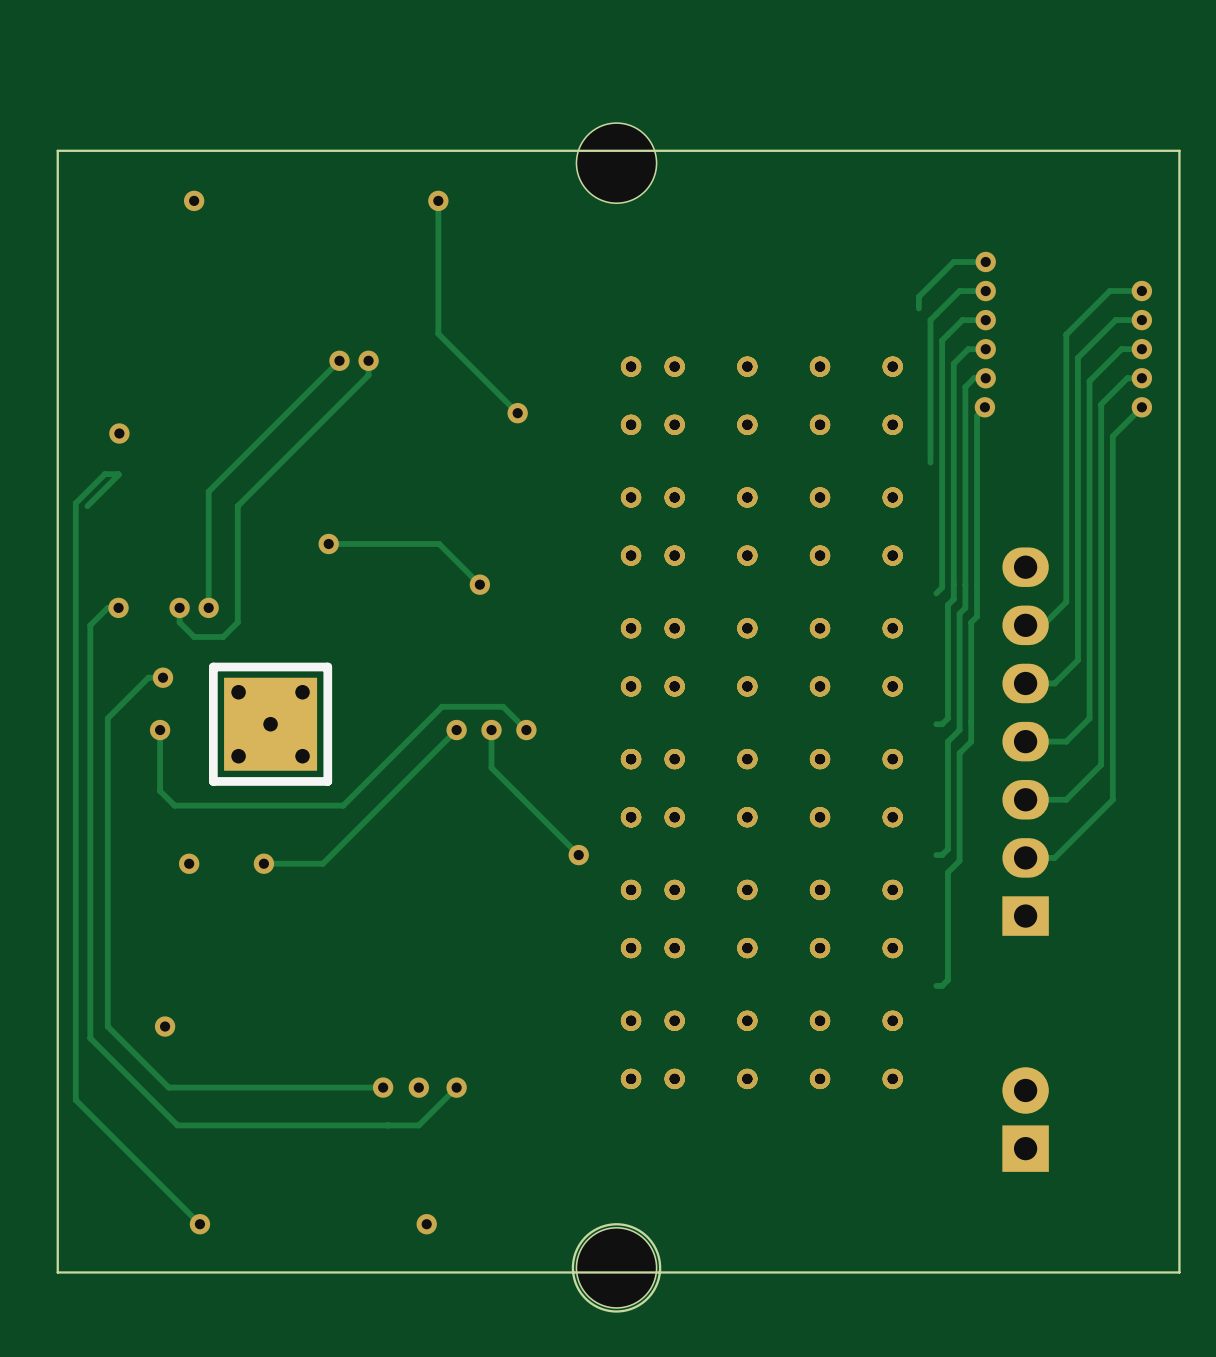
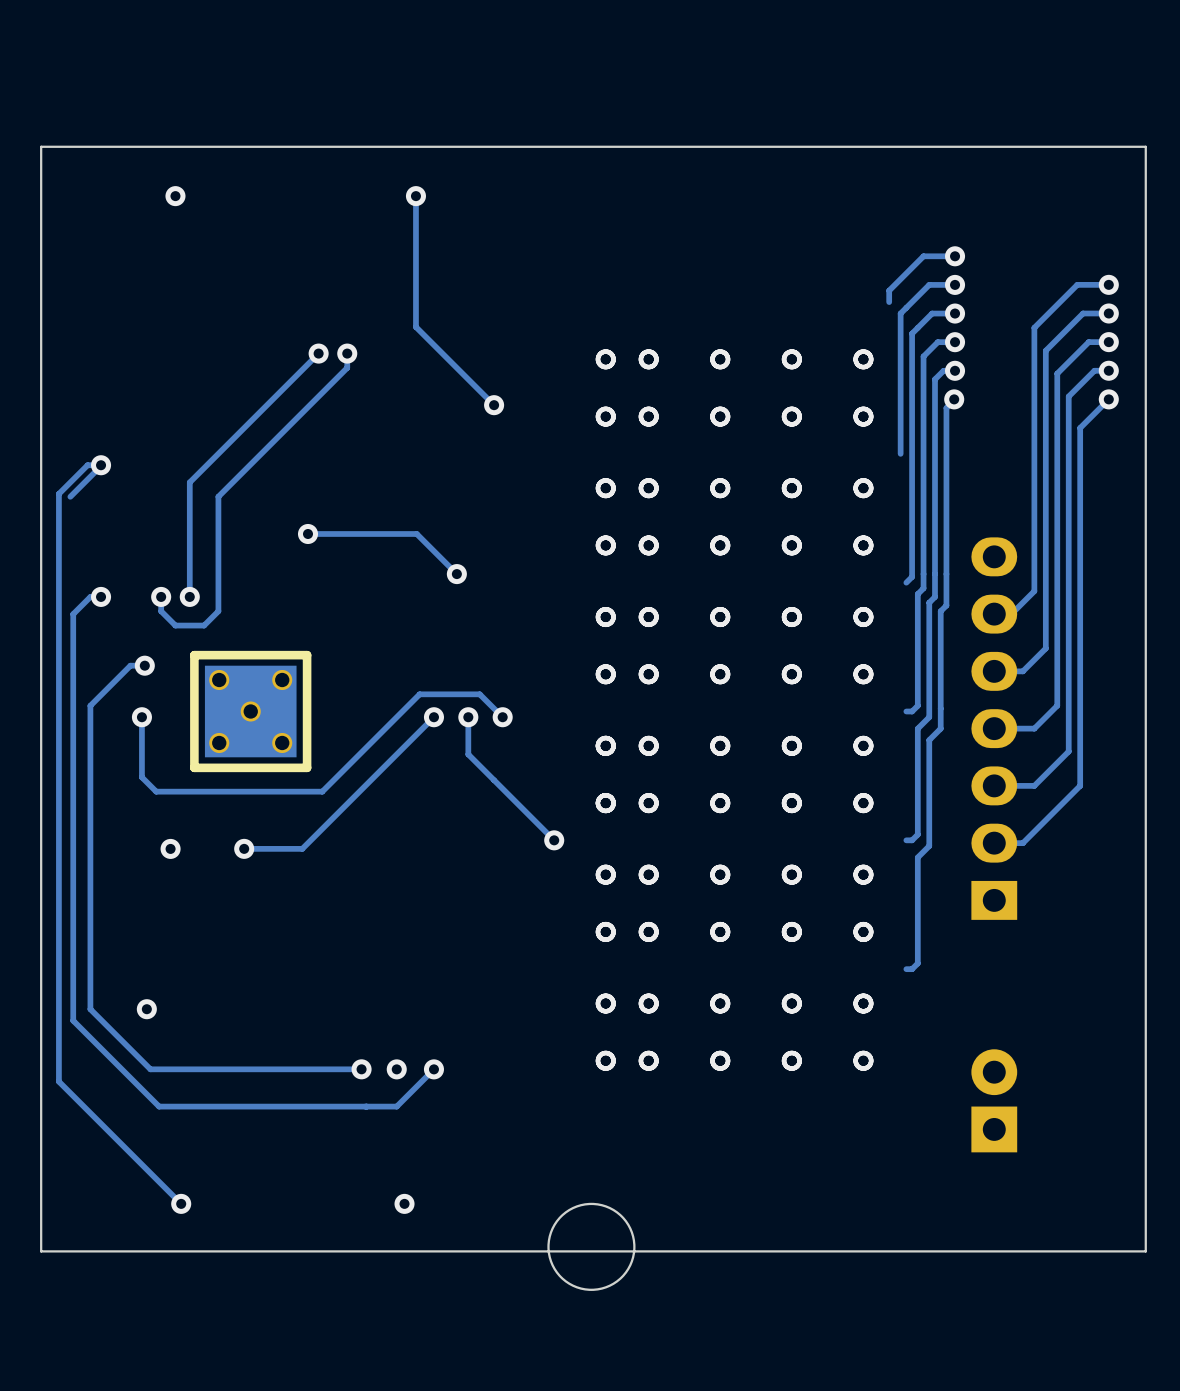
part: (616, 163) -> none
via position: (119, 433) -> (101, 465)
part: (616, 1267) -> none

